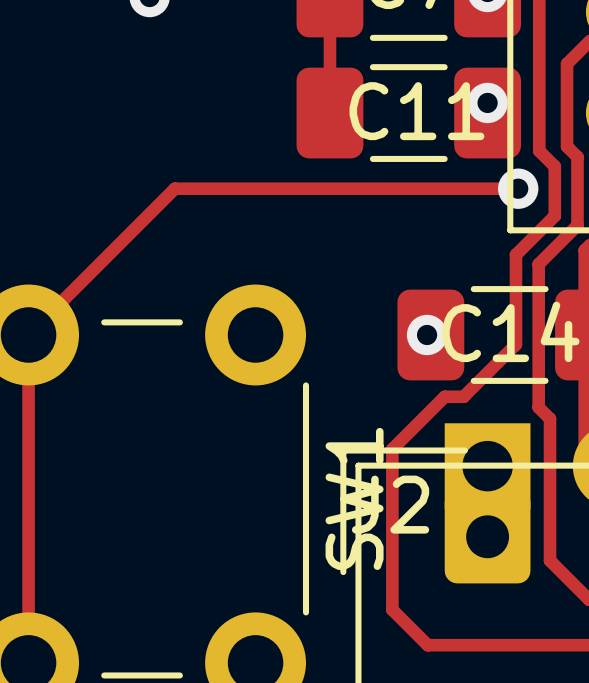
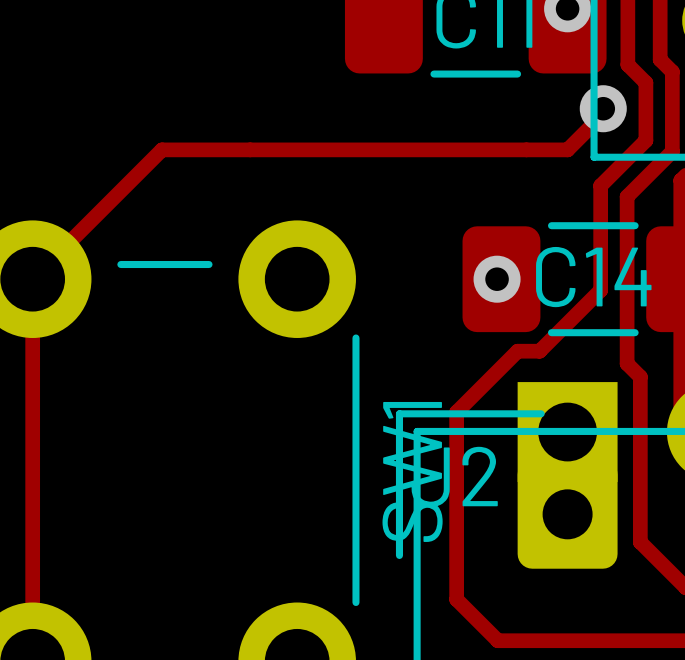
track: (518, 188) (174, 188) (139, 224) -> (608, 108) (567, 149) (161, 149)

